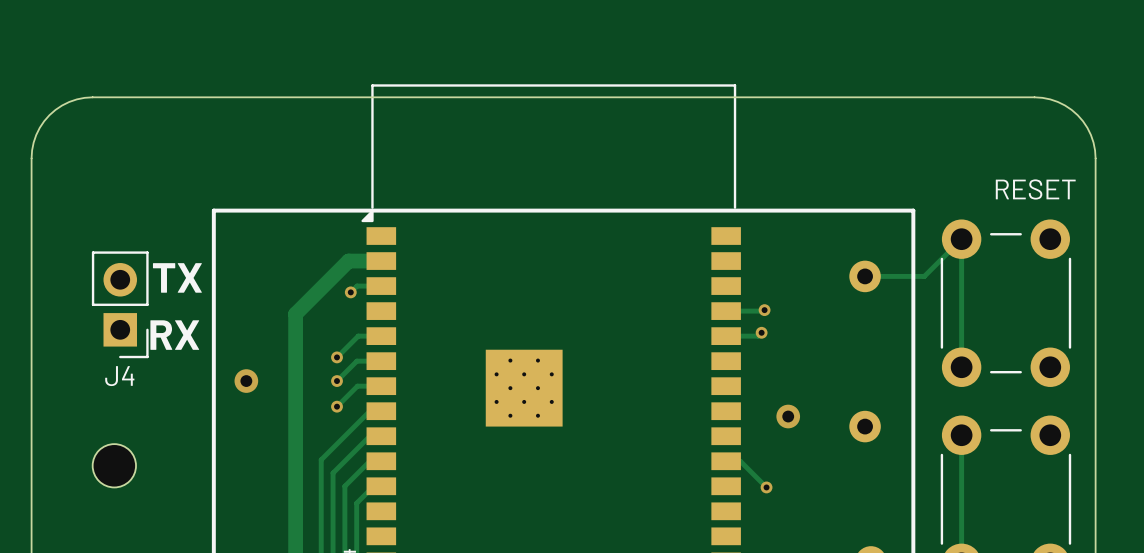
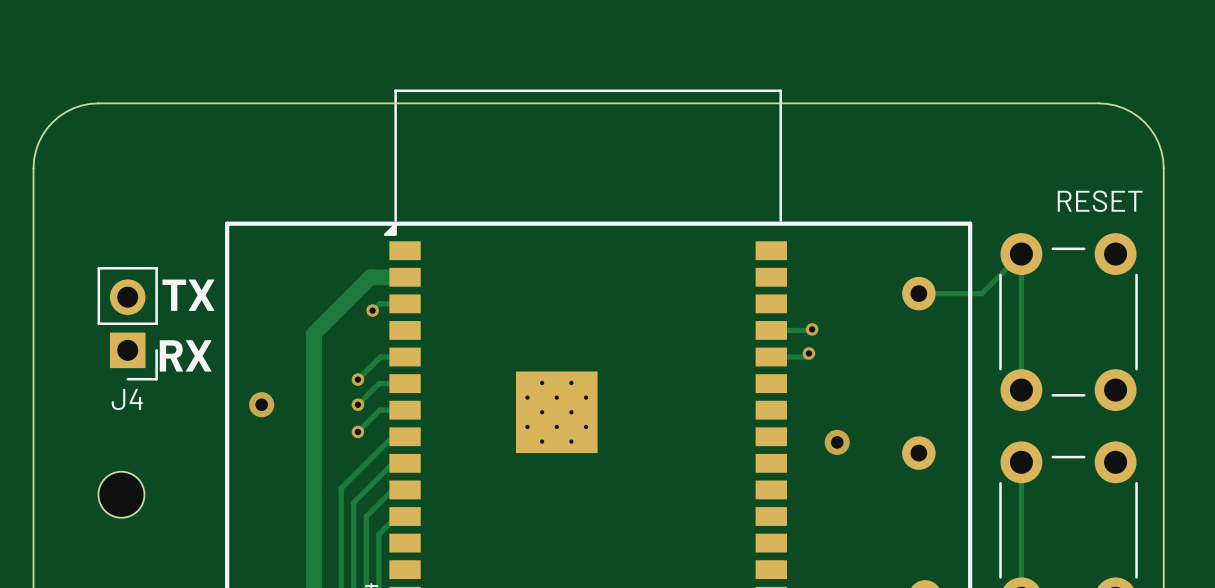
track: (726, 461) (740, 461) (766, 487) -> none
via: (766, 487) -> none

